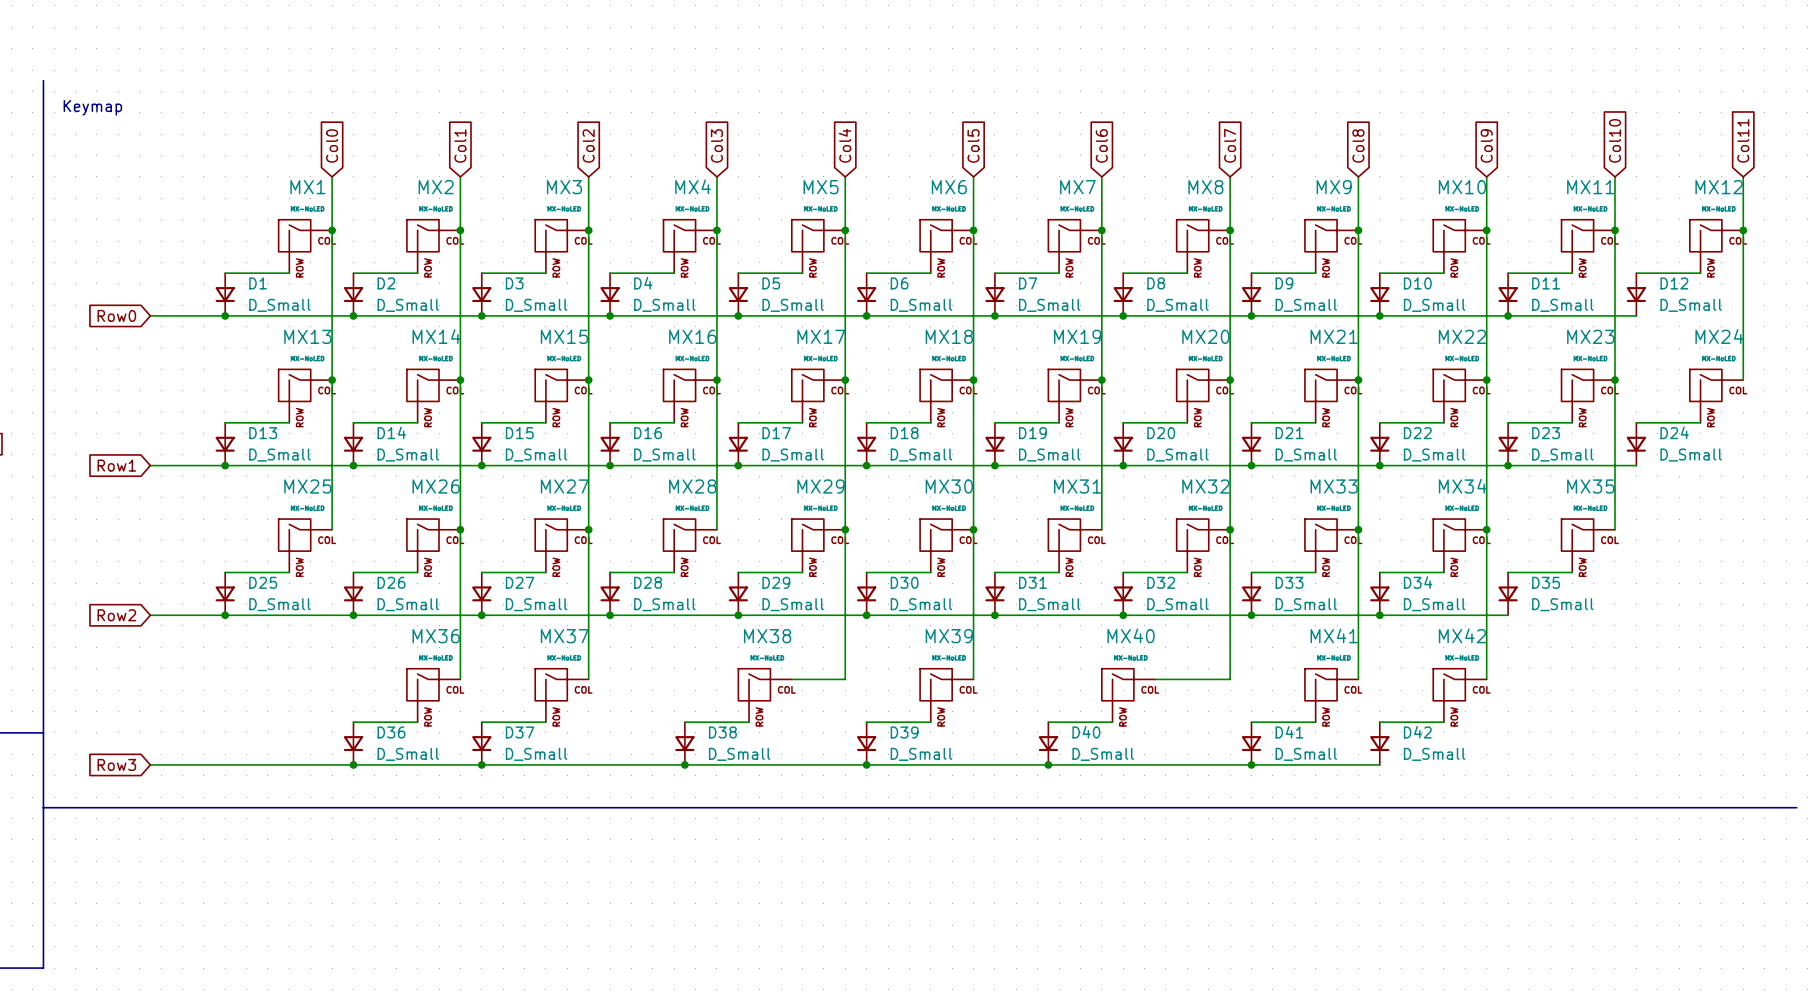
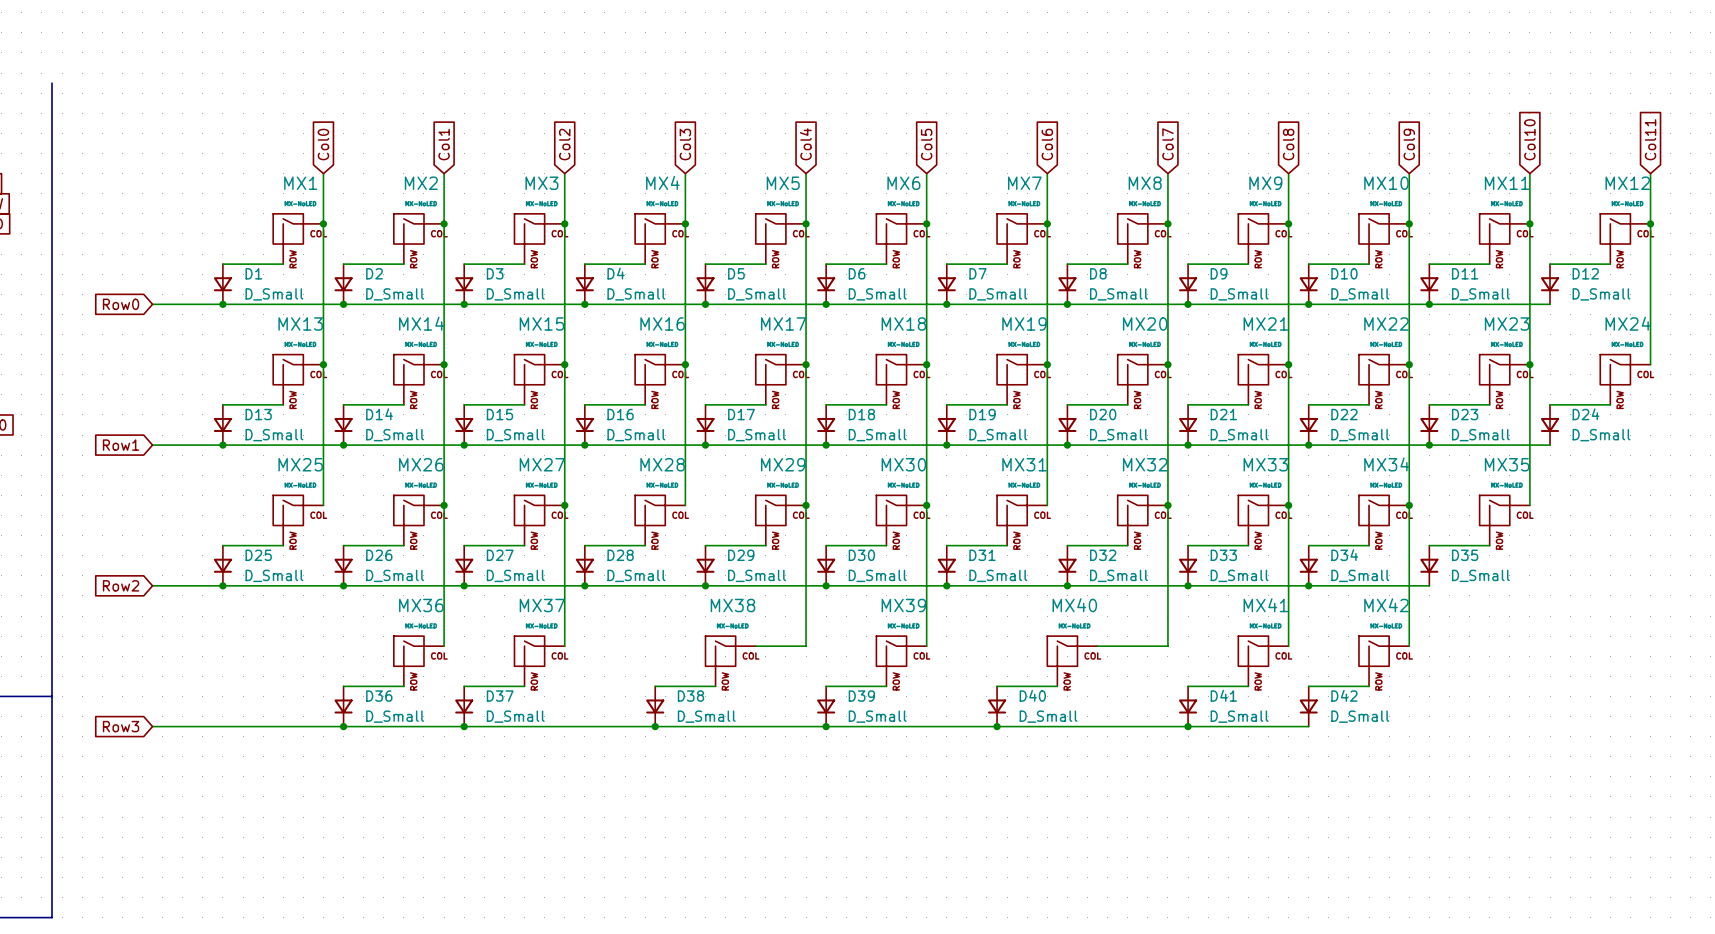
text: Keymap (92, 107) -> none
line: (43, 807) (1796, 807) -> none

